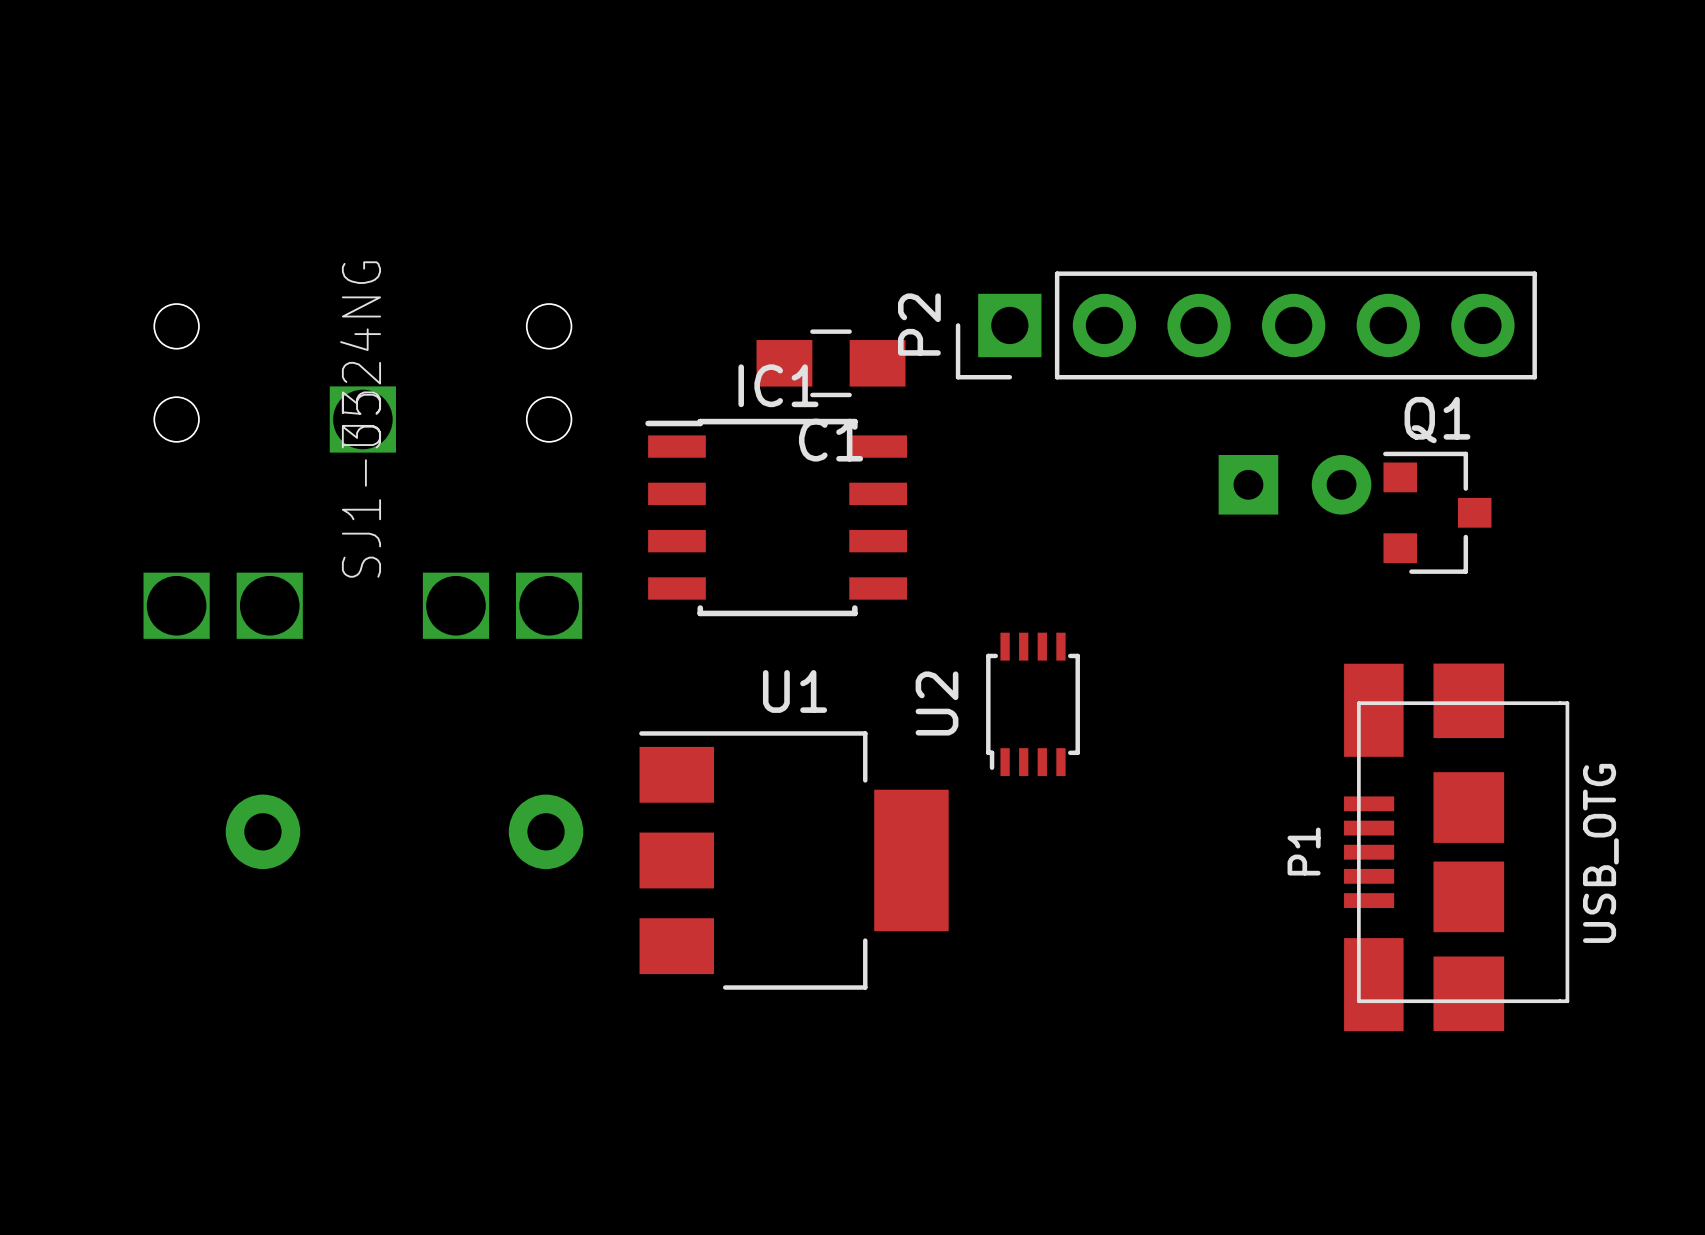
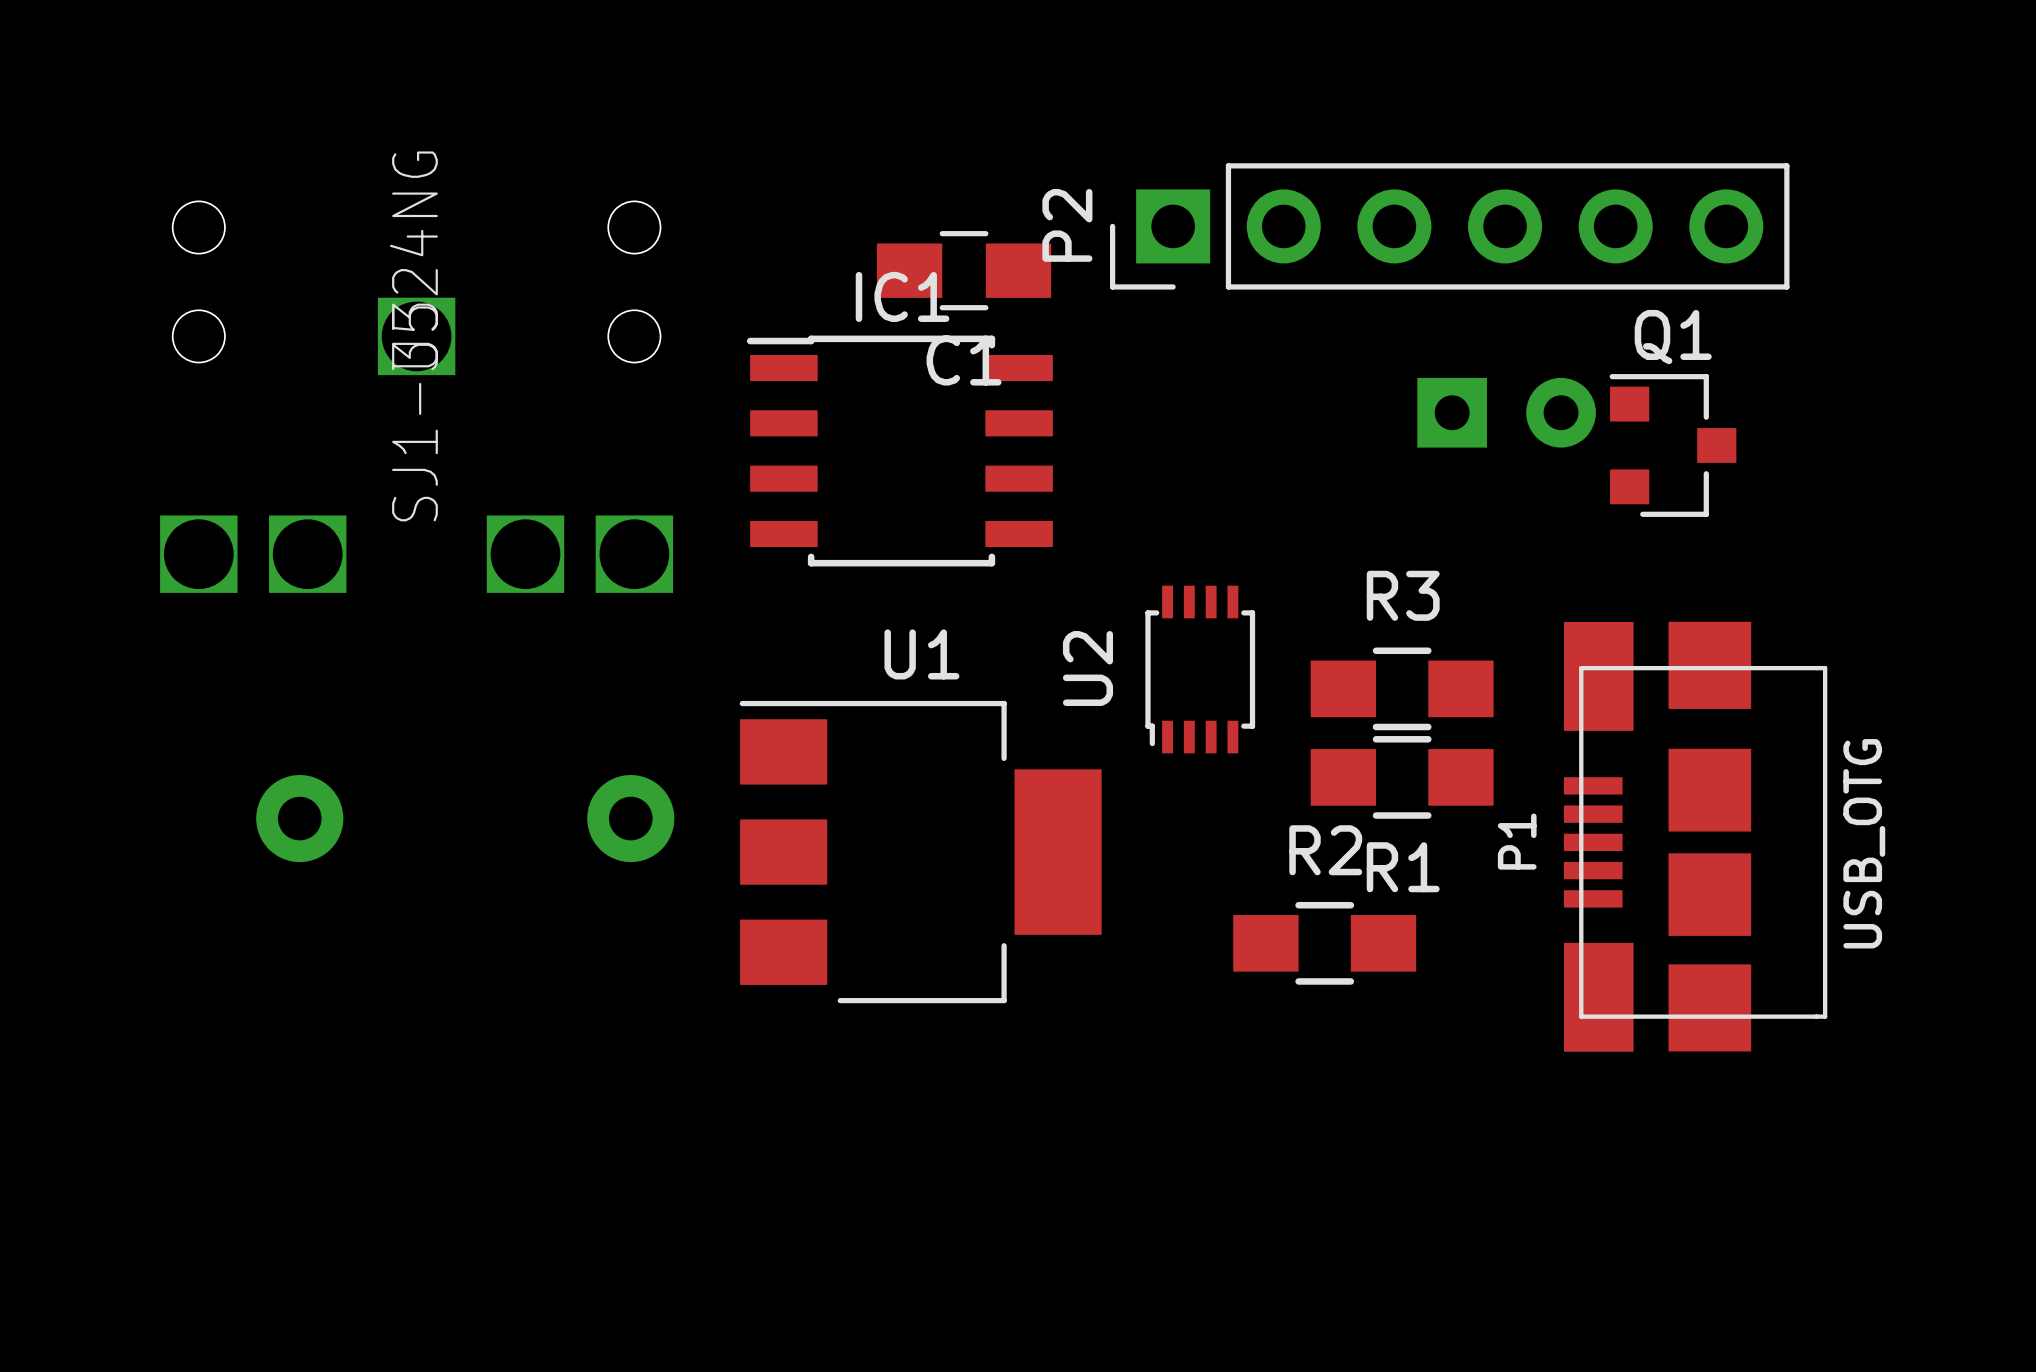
R3: none -> (1402, 688)
R1: none -> (1402, 777)
R2: none -> (1324, 943)

